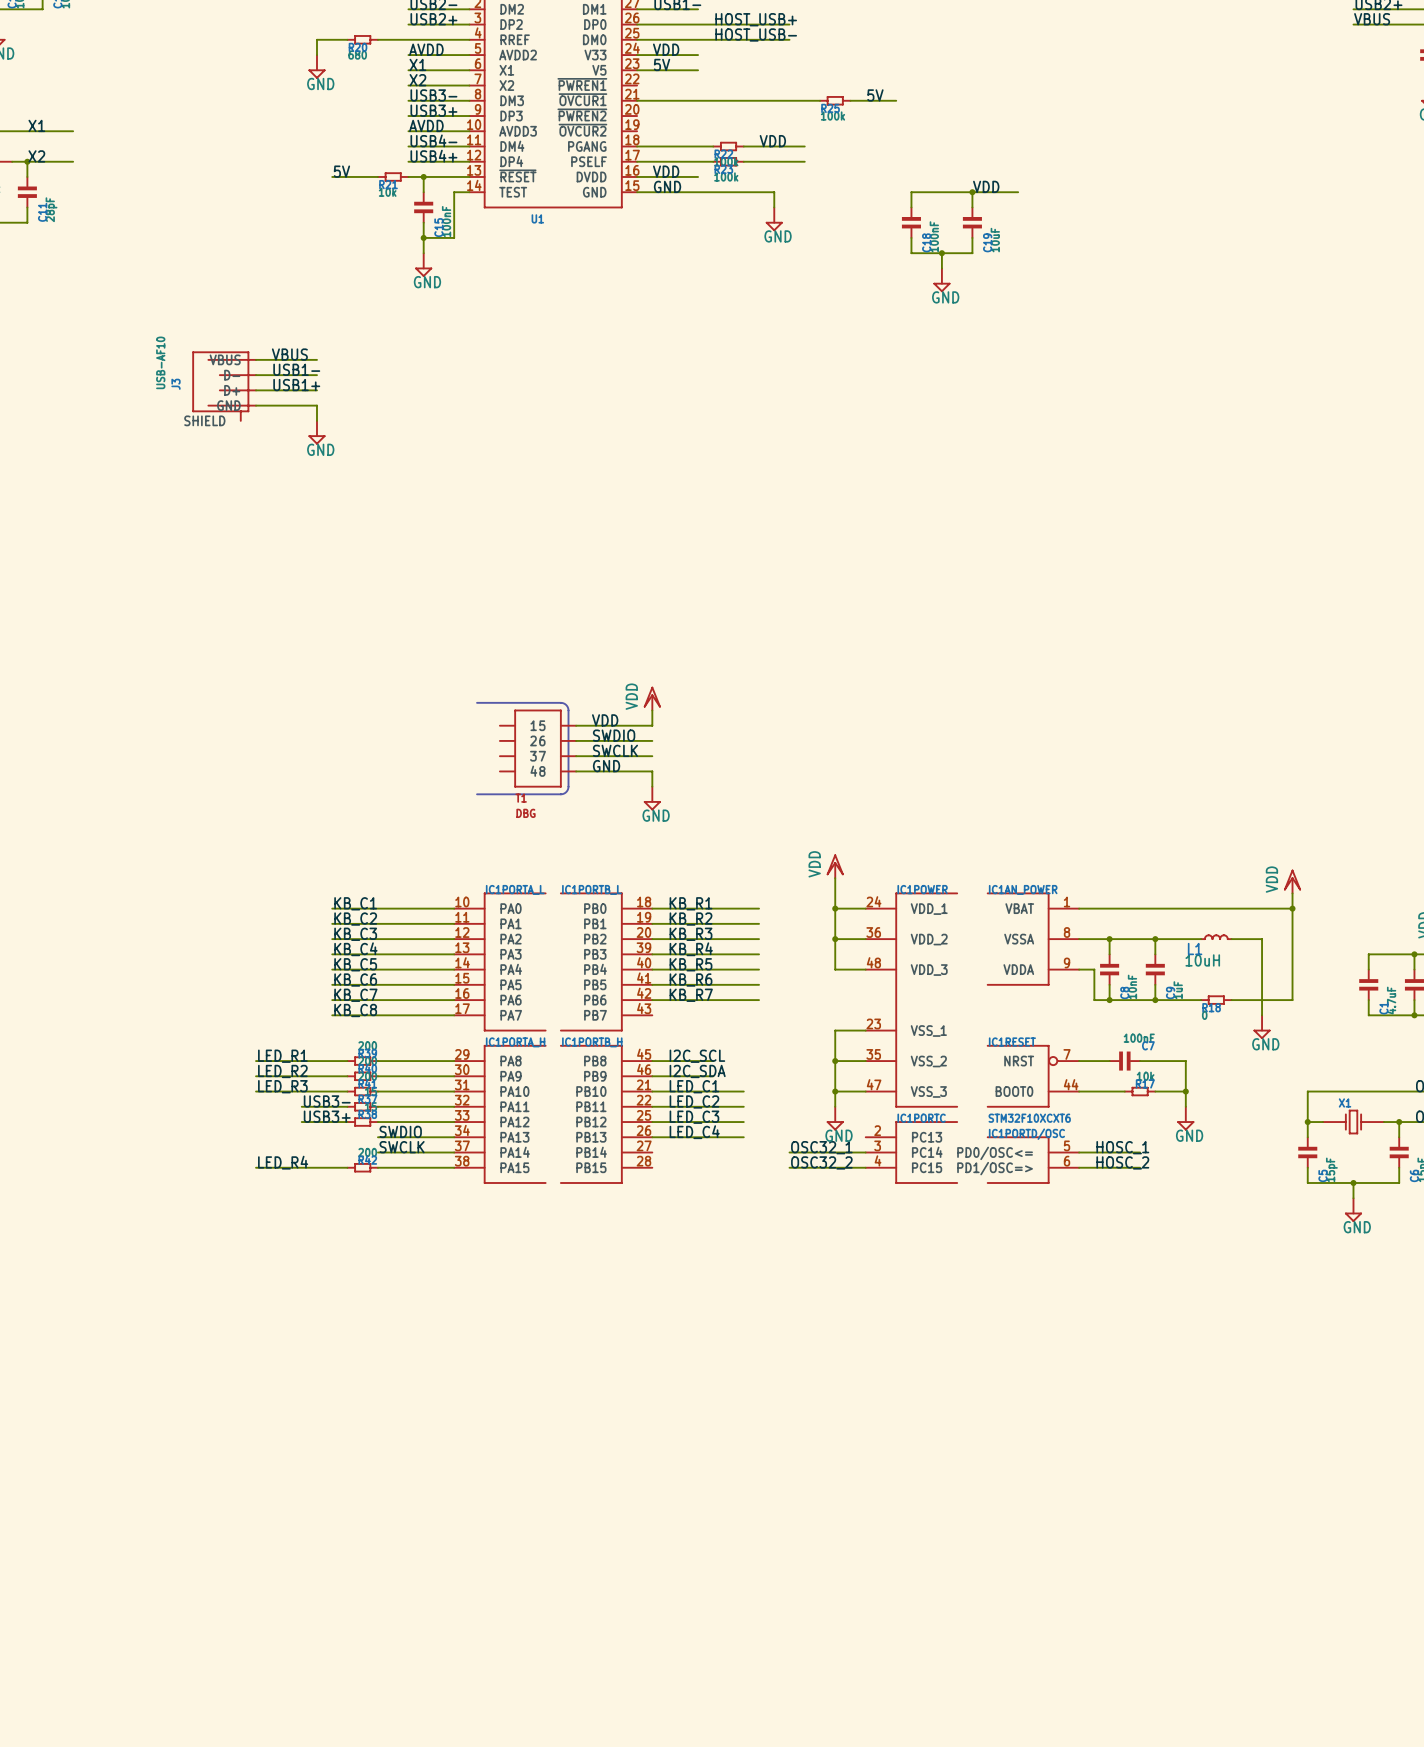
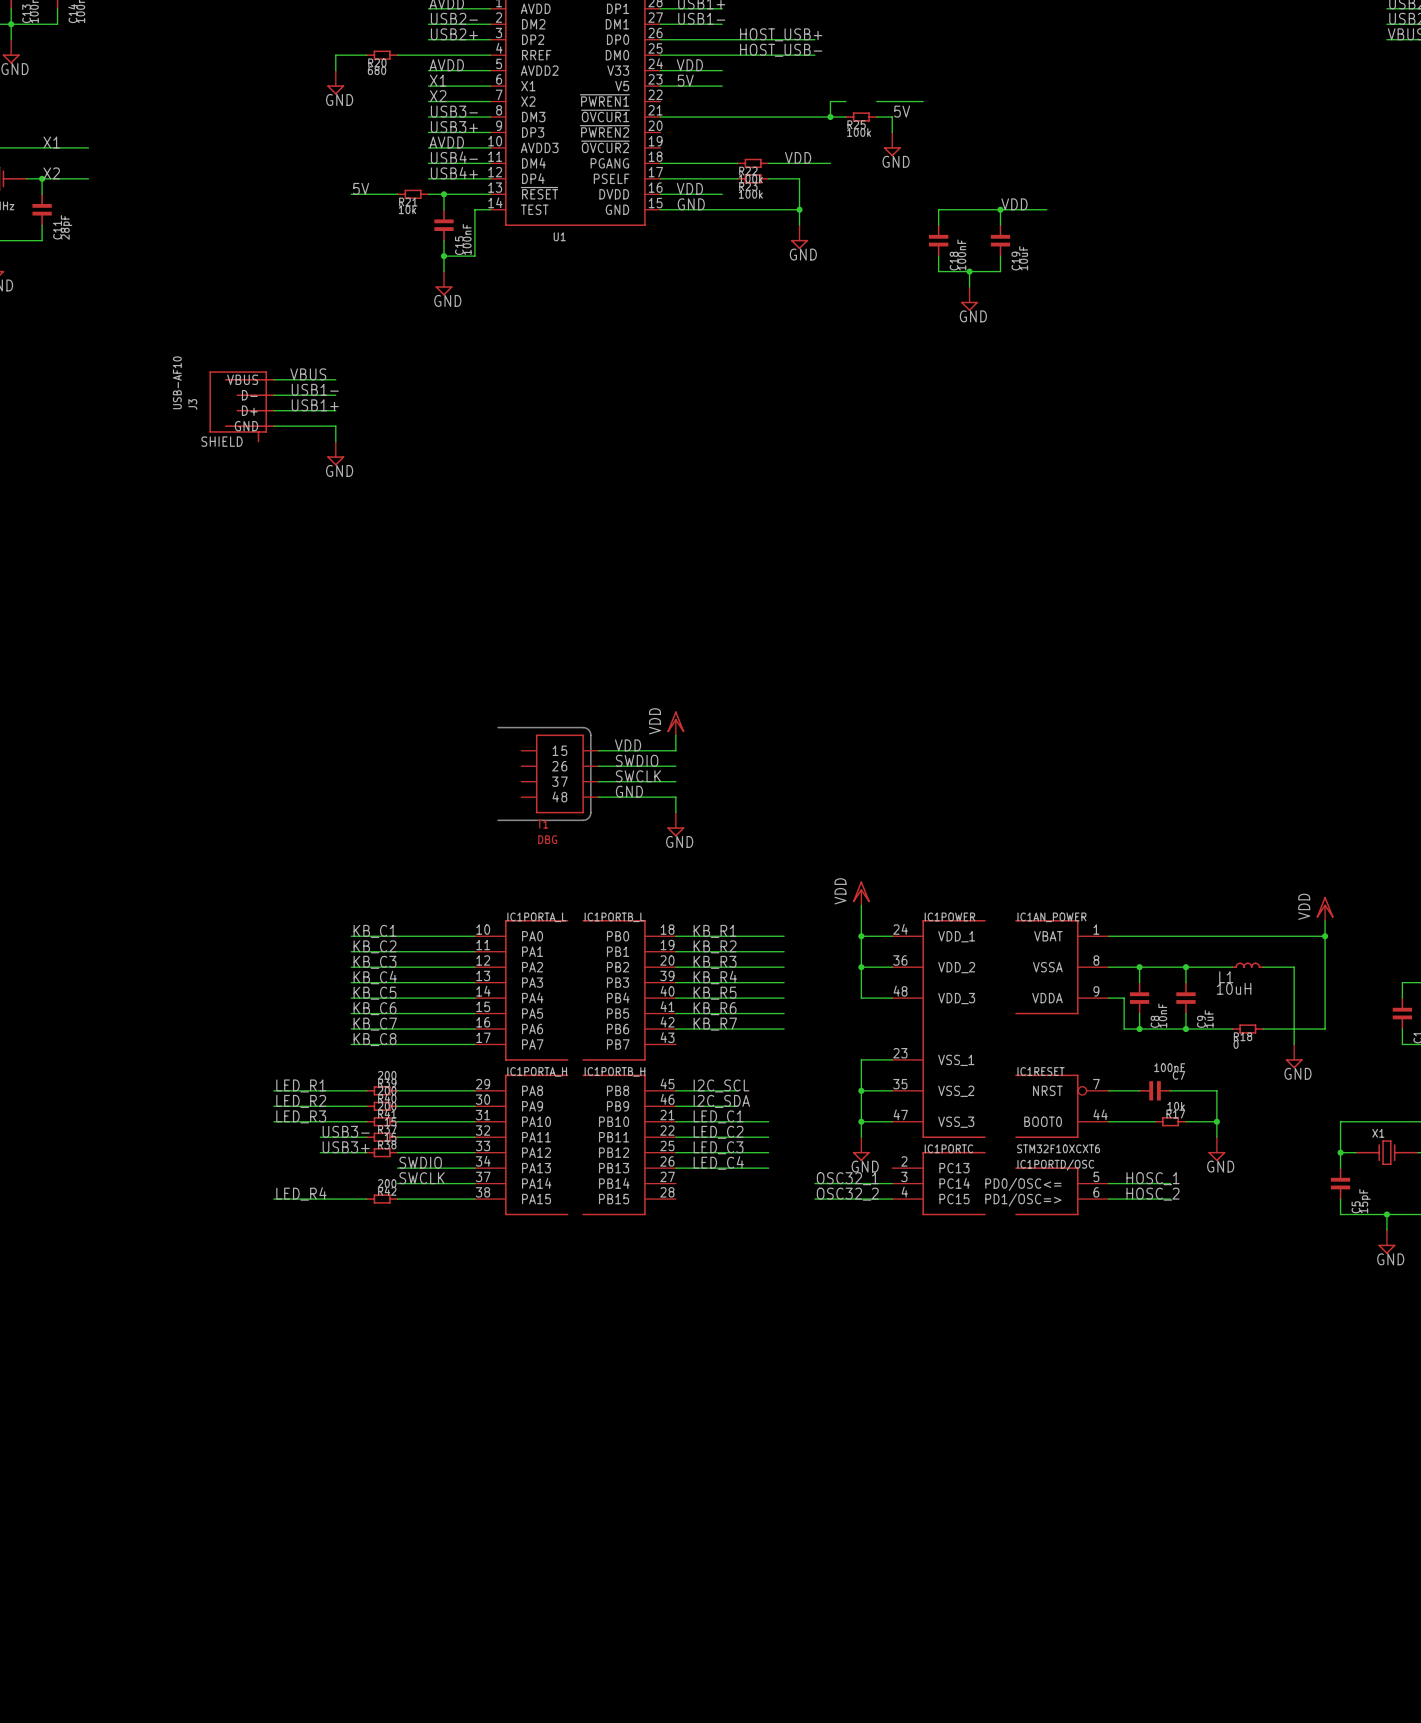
wire: none -> (845, 101) (830, 101) (830, 117)
wire: none -> (876, 101) (923, 101)
junction: none -> (830, 117)
wire: (865, 100) (896, 100) -> (892, 117) (892, 132)
power symbol: none -> GND (892, 144)
wire: (774, 161) (804, 161) -> (799, 178) (799, 209)
junction: none -> (799, 209)

